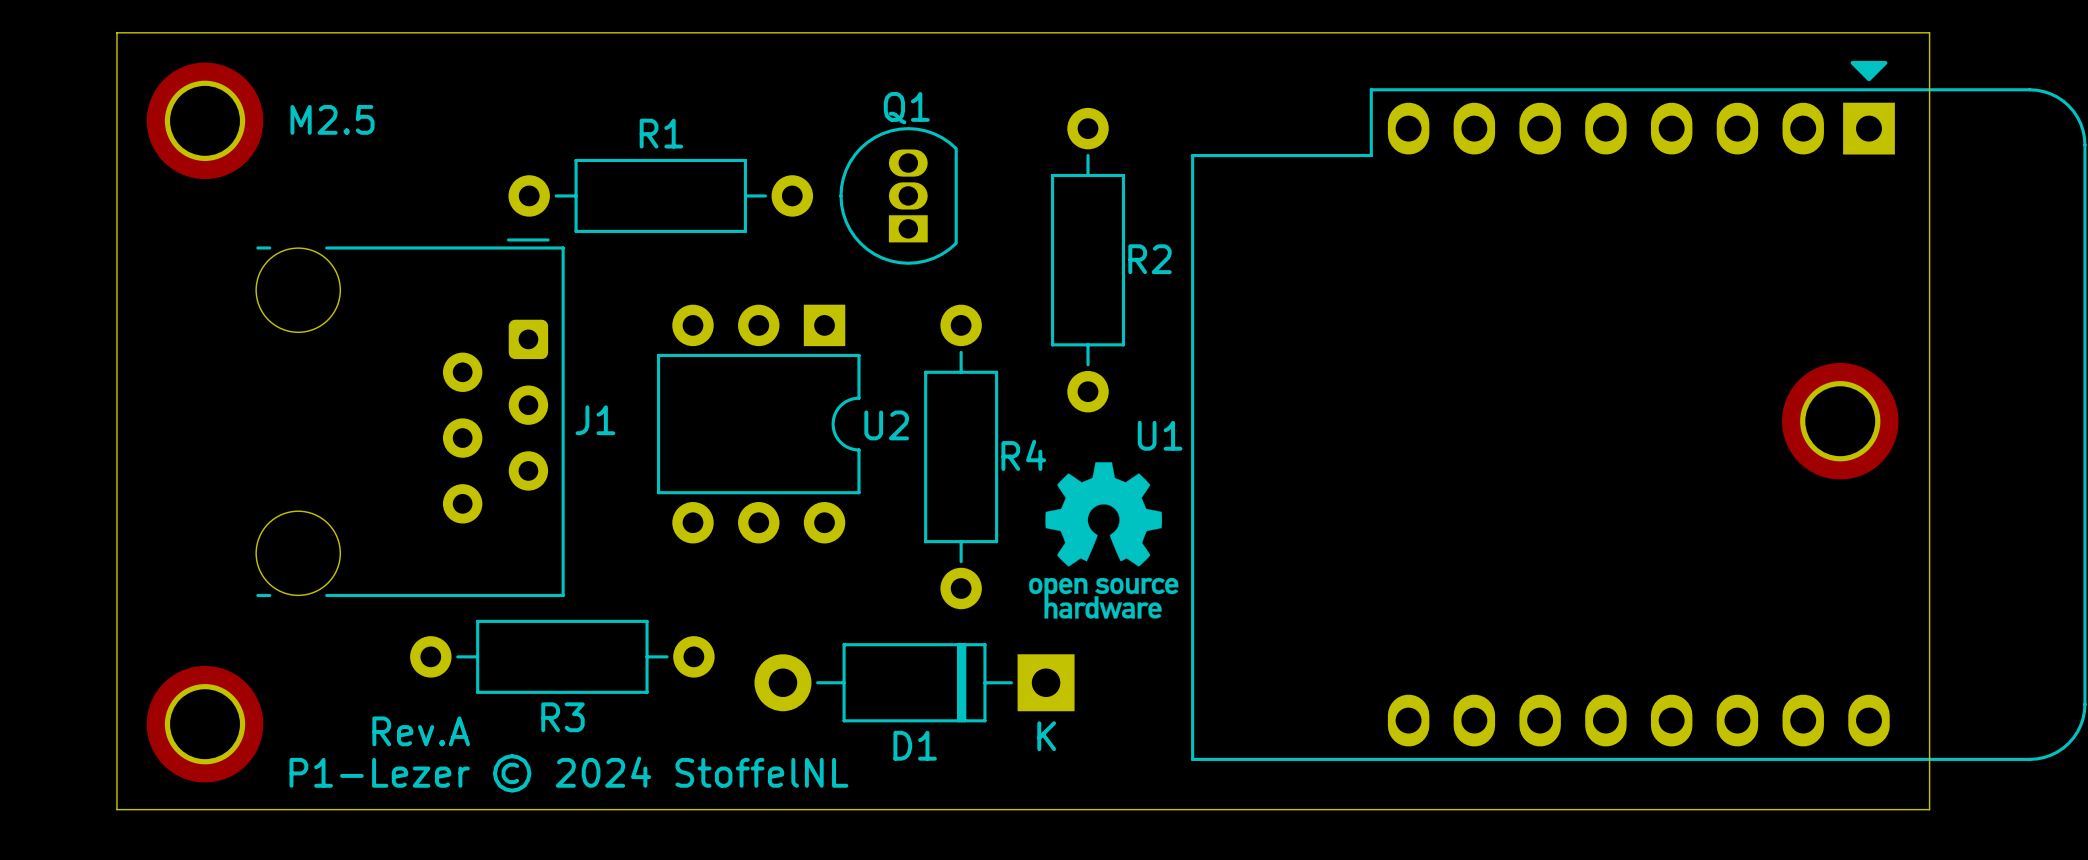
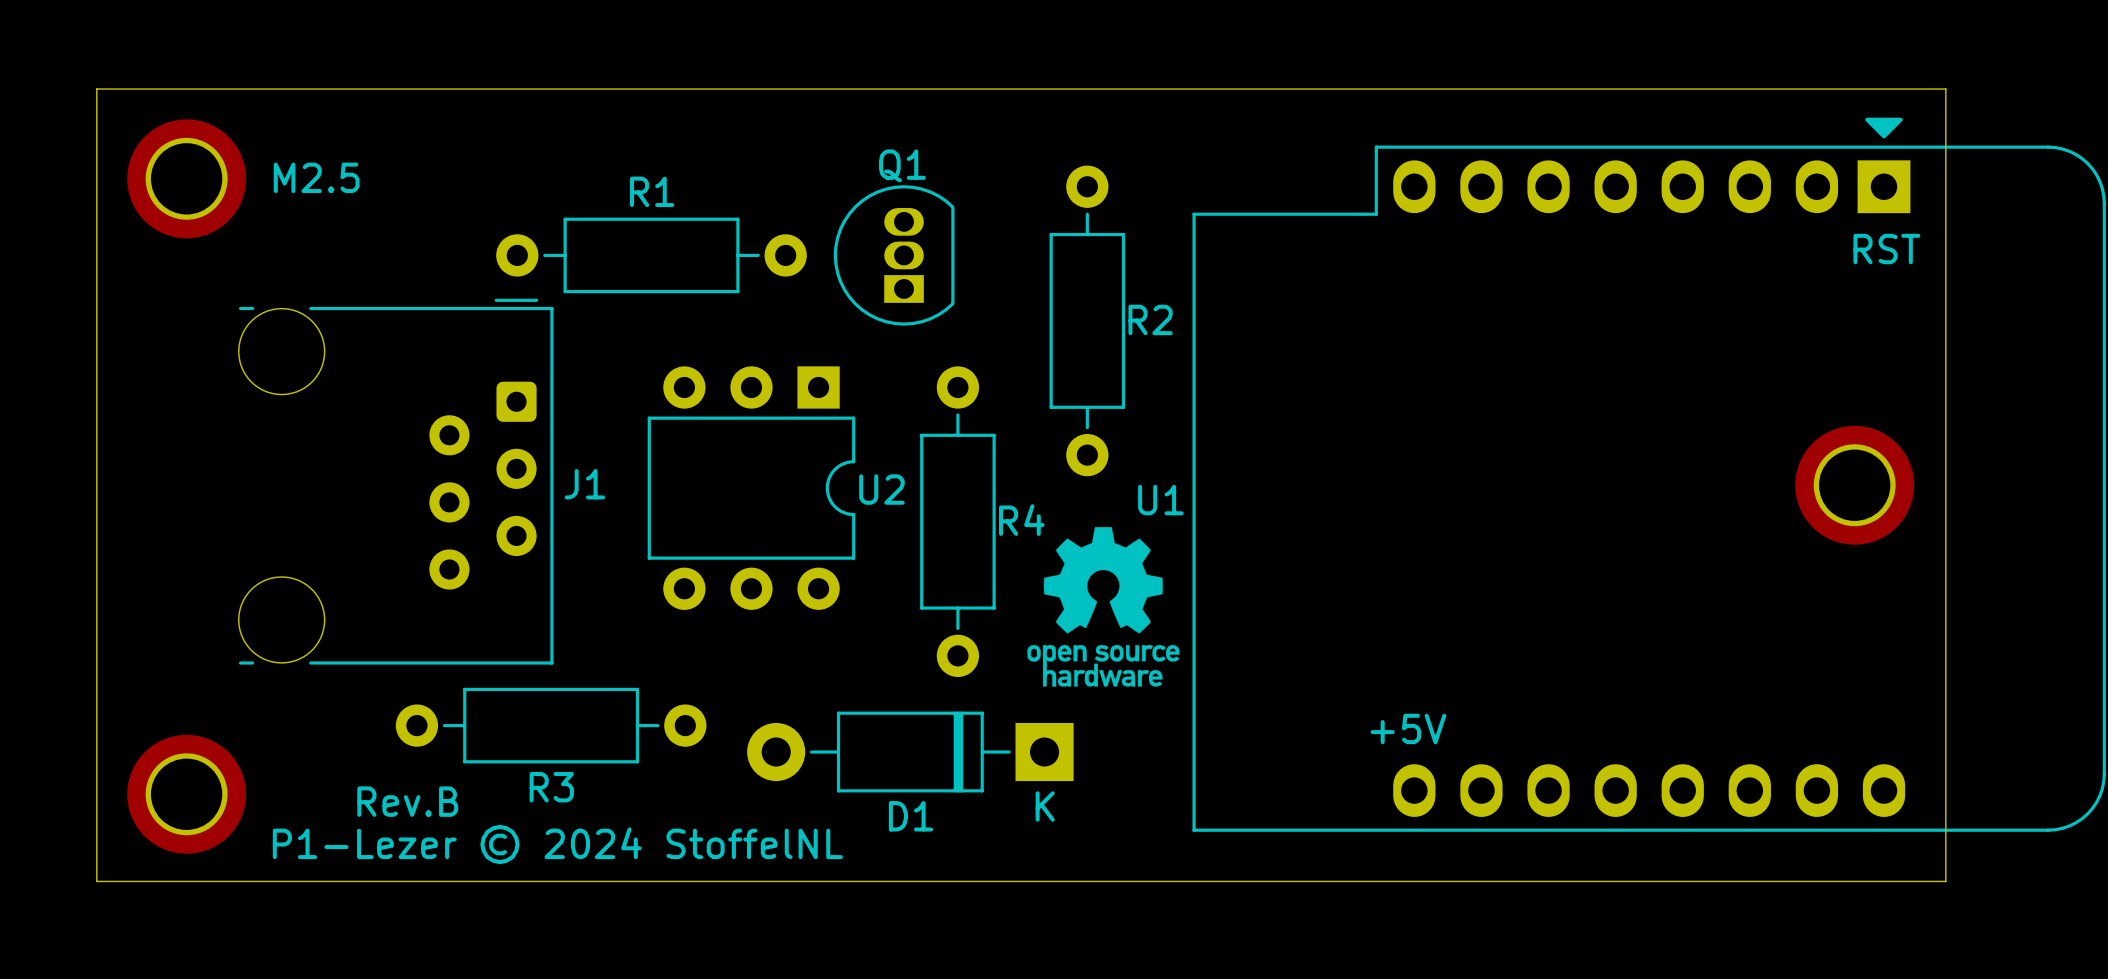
text: none -> RST (1886, 249)
text: none -> +5V (1408, 728)
text: Rev.A (421, 731) -> Rev.B (407, 801)

